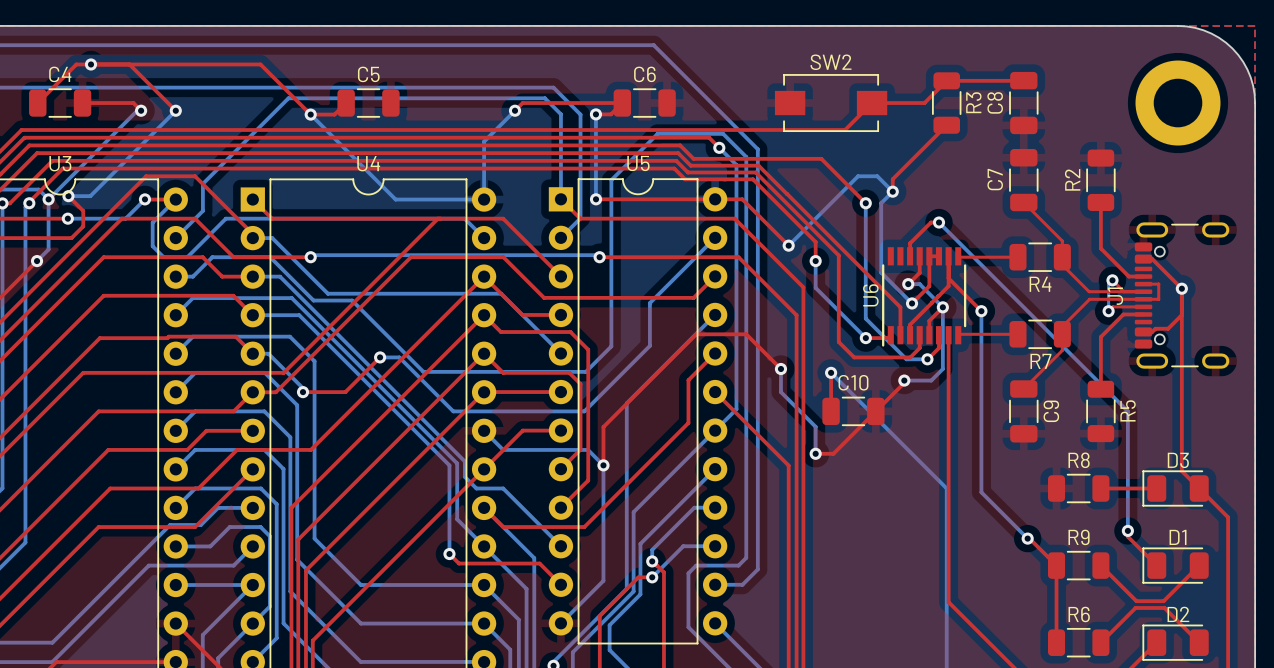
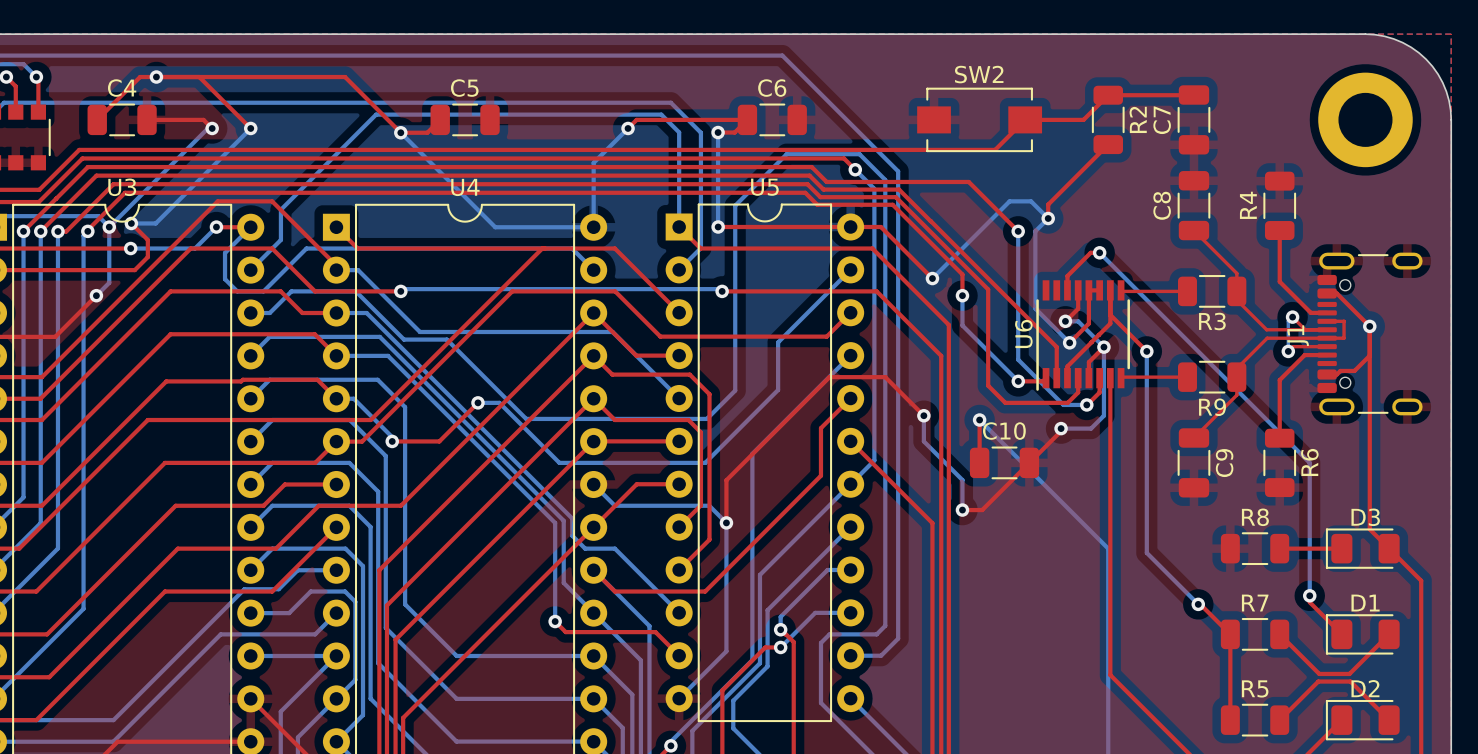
R3 name: R3 (973, 102) -> R2 (1138, 119)
C8 name: C8 (995, 102) -> C7 (1162, 120)
C7 name: C7 (995, 179) -> C8 (1162, 205)
R2 name: R2 (1072, 179) -> R4 (1248, 205)
R4 name: R4 (1040, 284) -> R3 (1212, 321)
R7 name: R7 (1040, 361) -> R9 (1212, 407)
R5 name: R5 (1128, 410) -> R6 (1309, 462)
R9 name: R9 (1079, 537) -> R7 (1255, 603)
R6 name: R6 (1079, 614) -> R5 (1255, 688)

